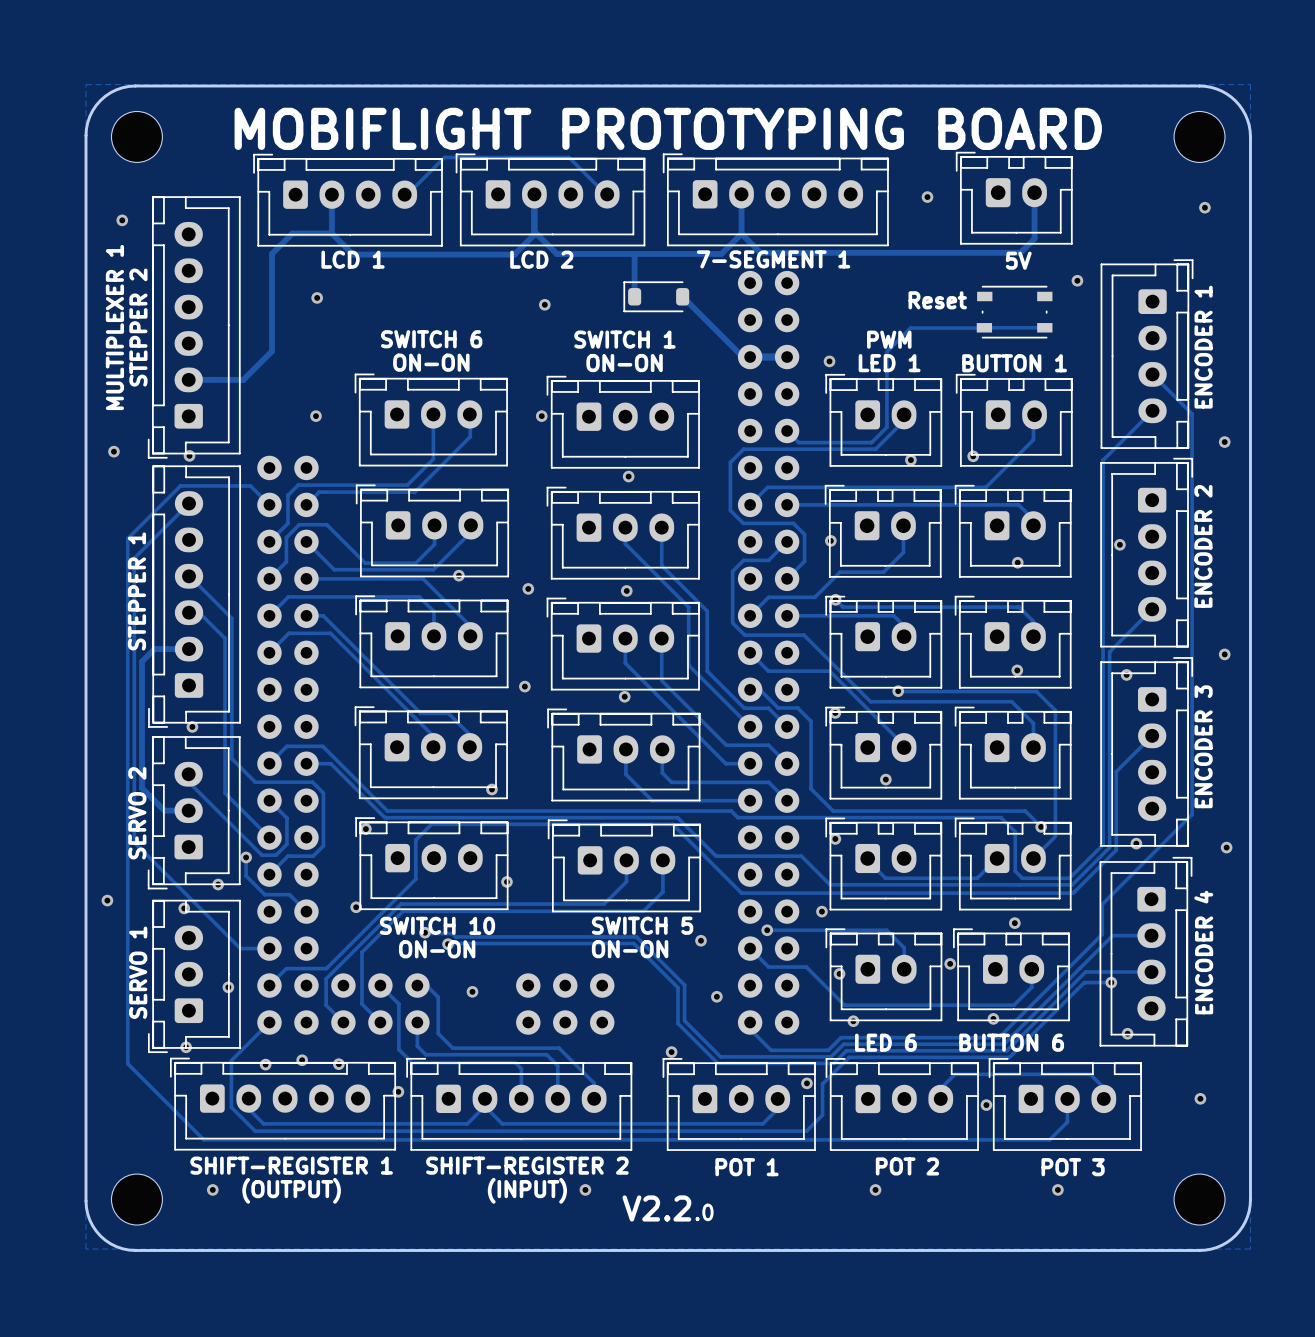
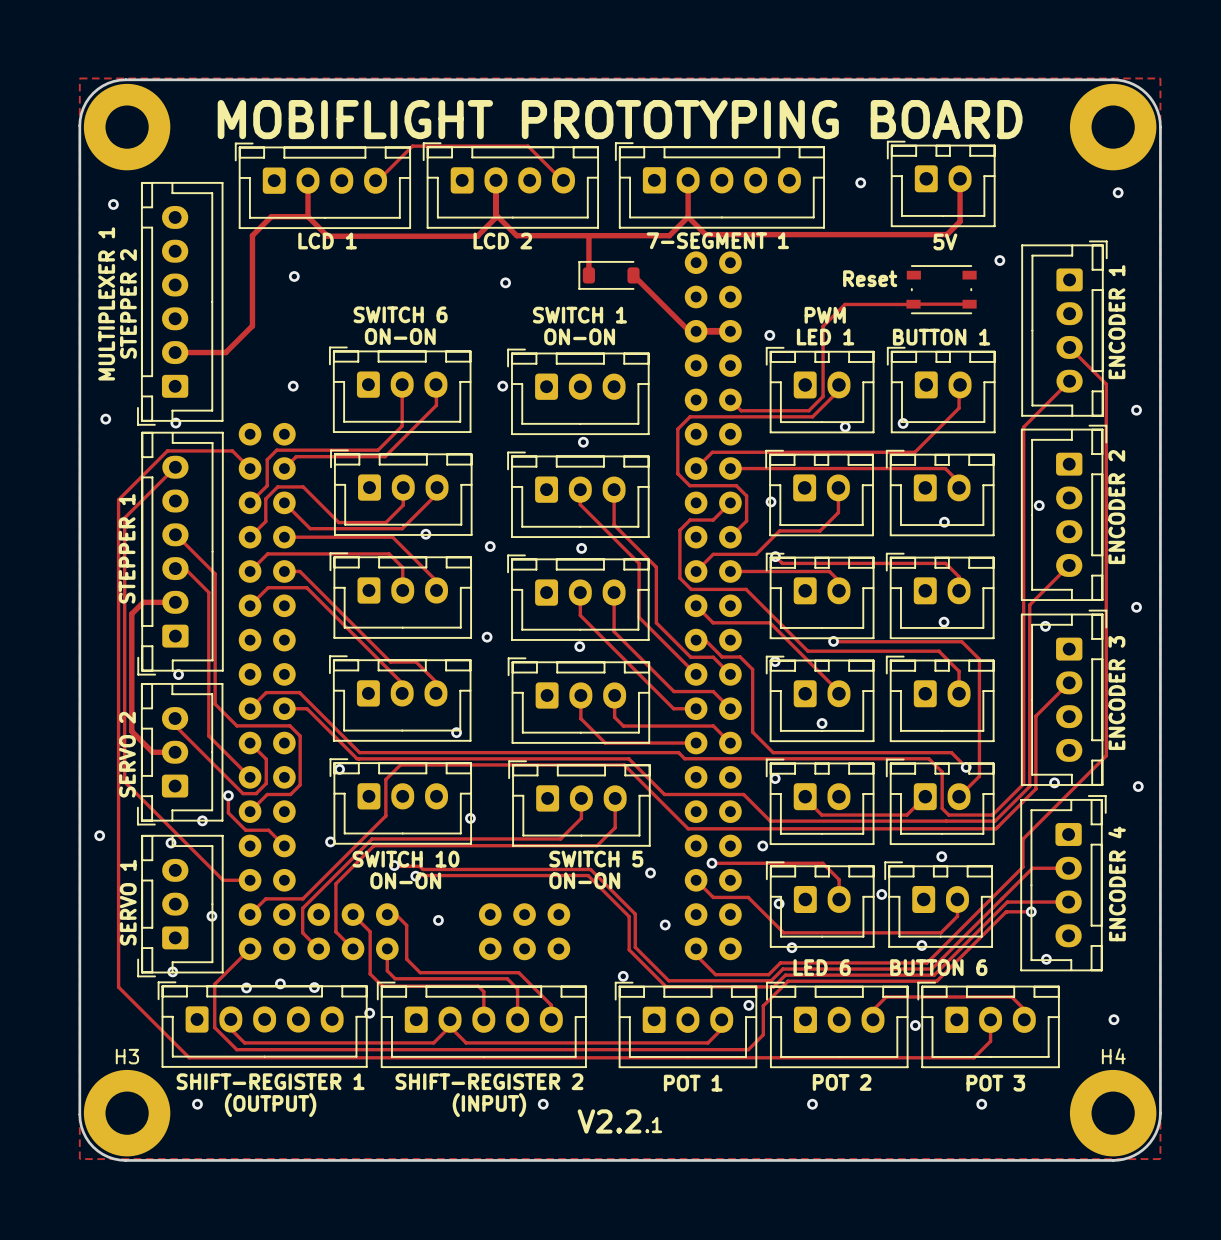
part footprint: [111, 111, 163, 163] -> [83, 83, 171, 171]
part footprint: [1174, 111, 1226, 163] -> [1069, 83, 1157, 171]
part: (136, 1199) -> none
H3: none -> (127, 1113)
part: (1199, 1199) -> none
H4: none -> (1113, 1113)
text: .0 (704, 1212) -> .1 (653, 1125)

